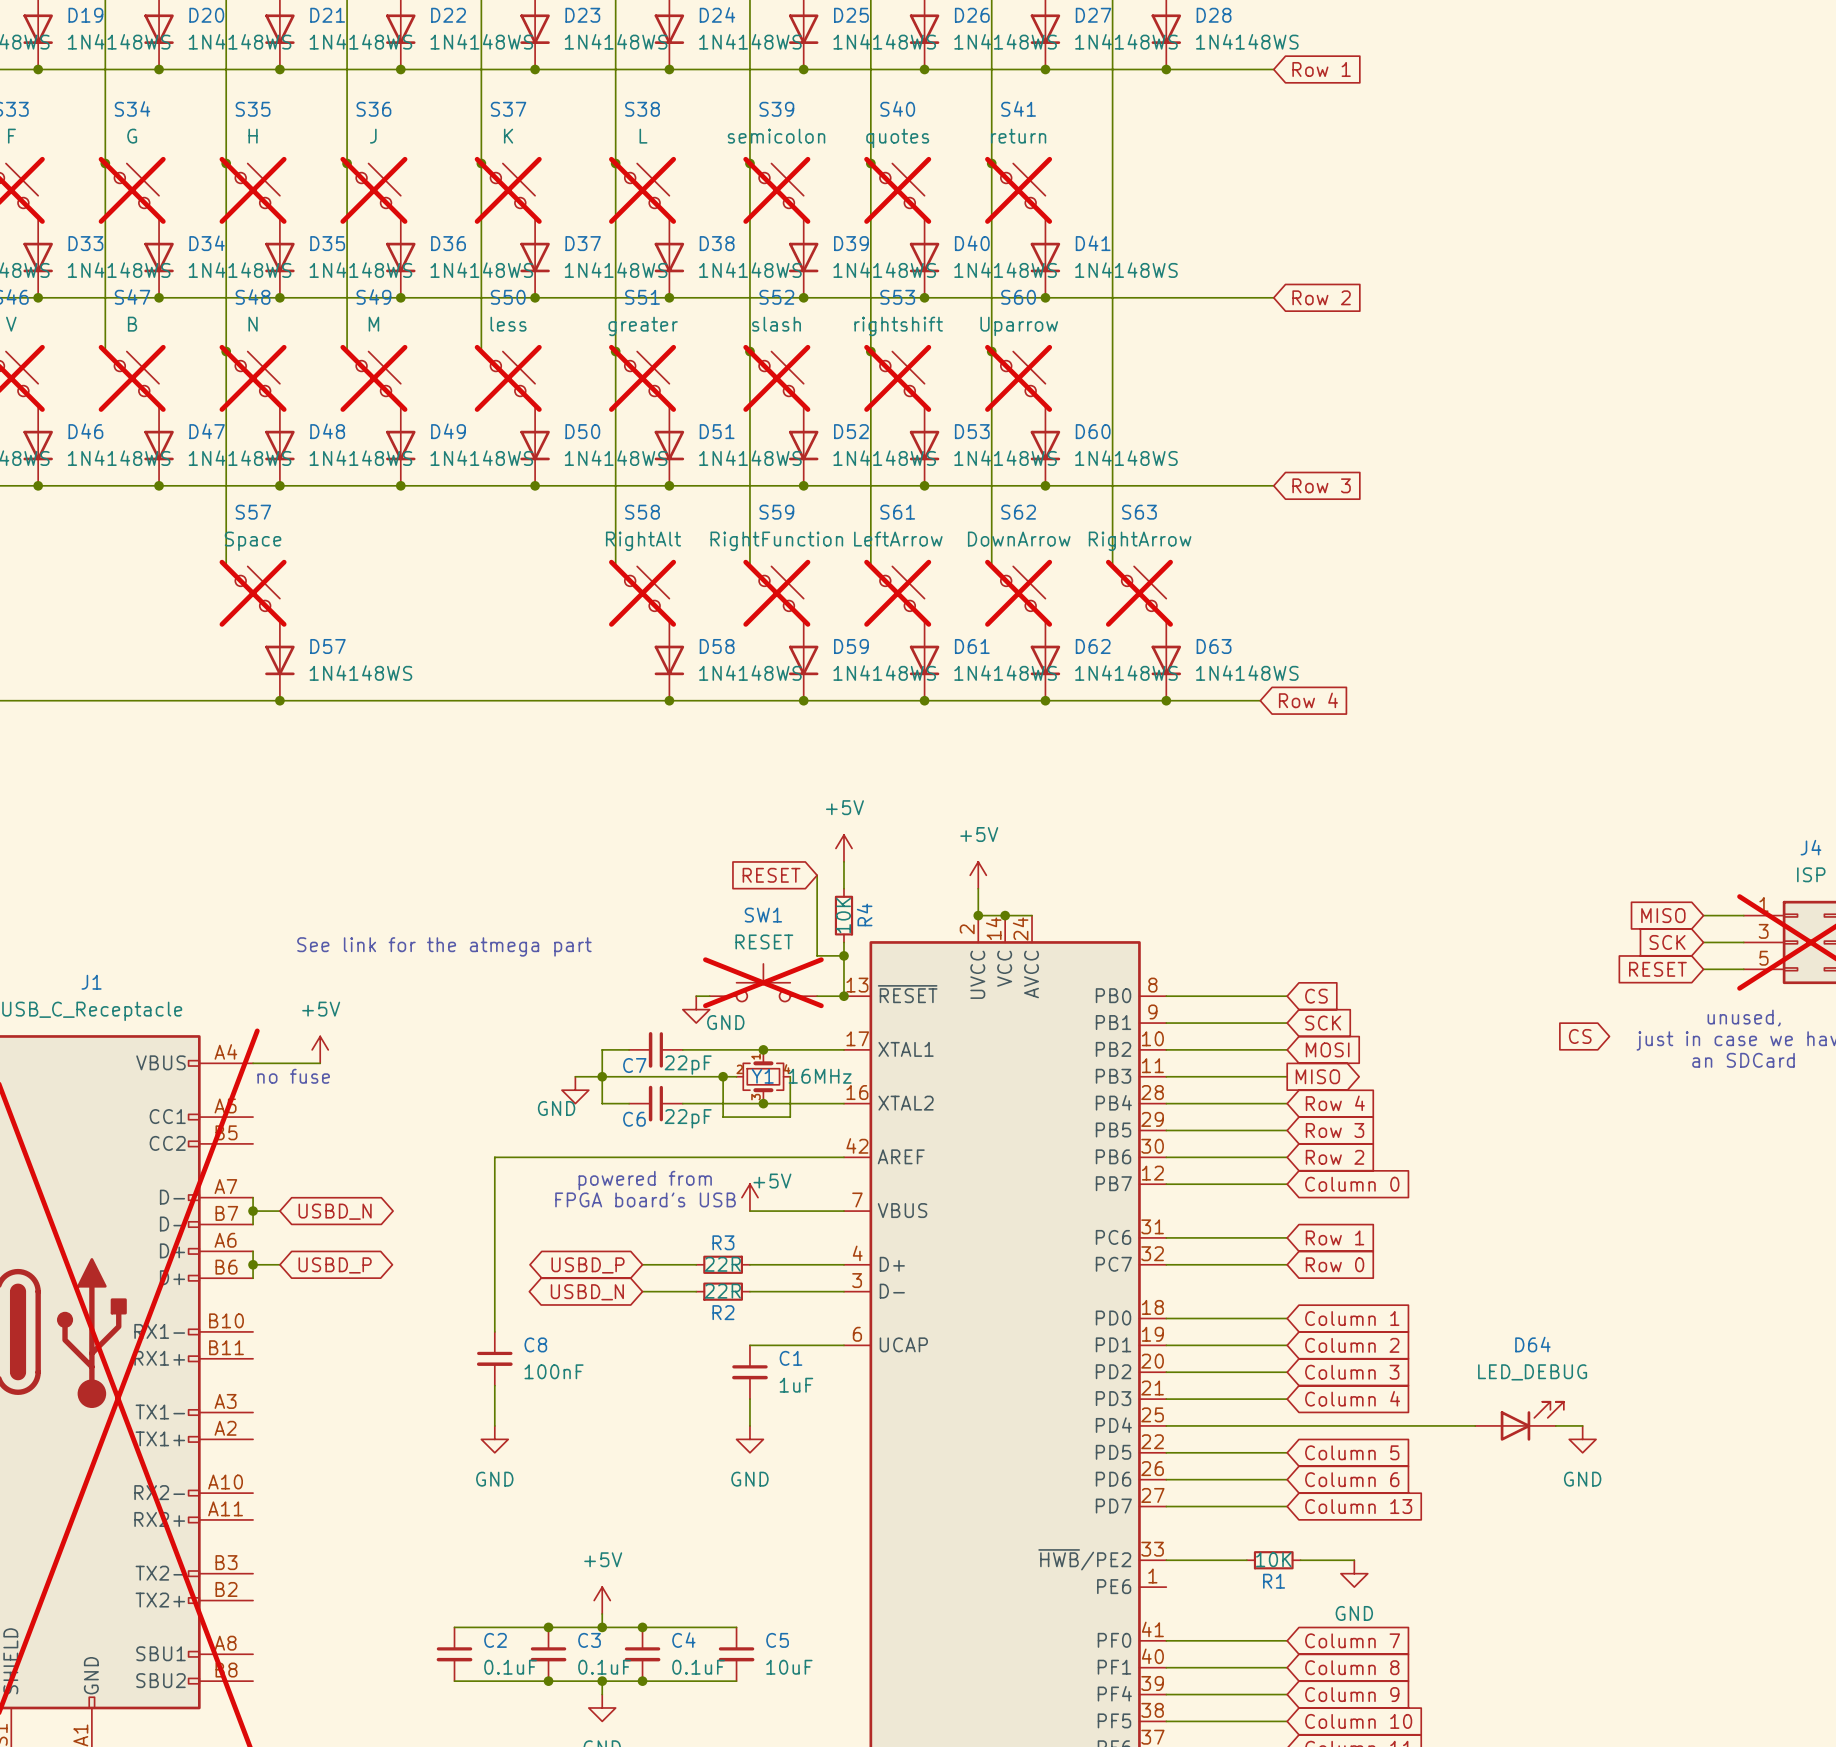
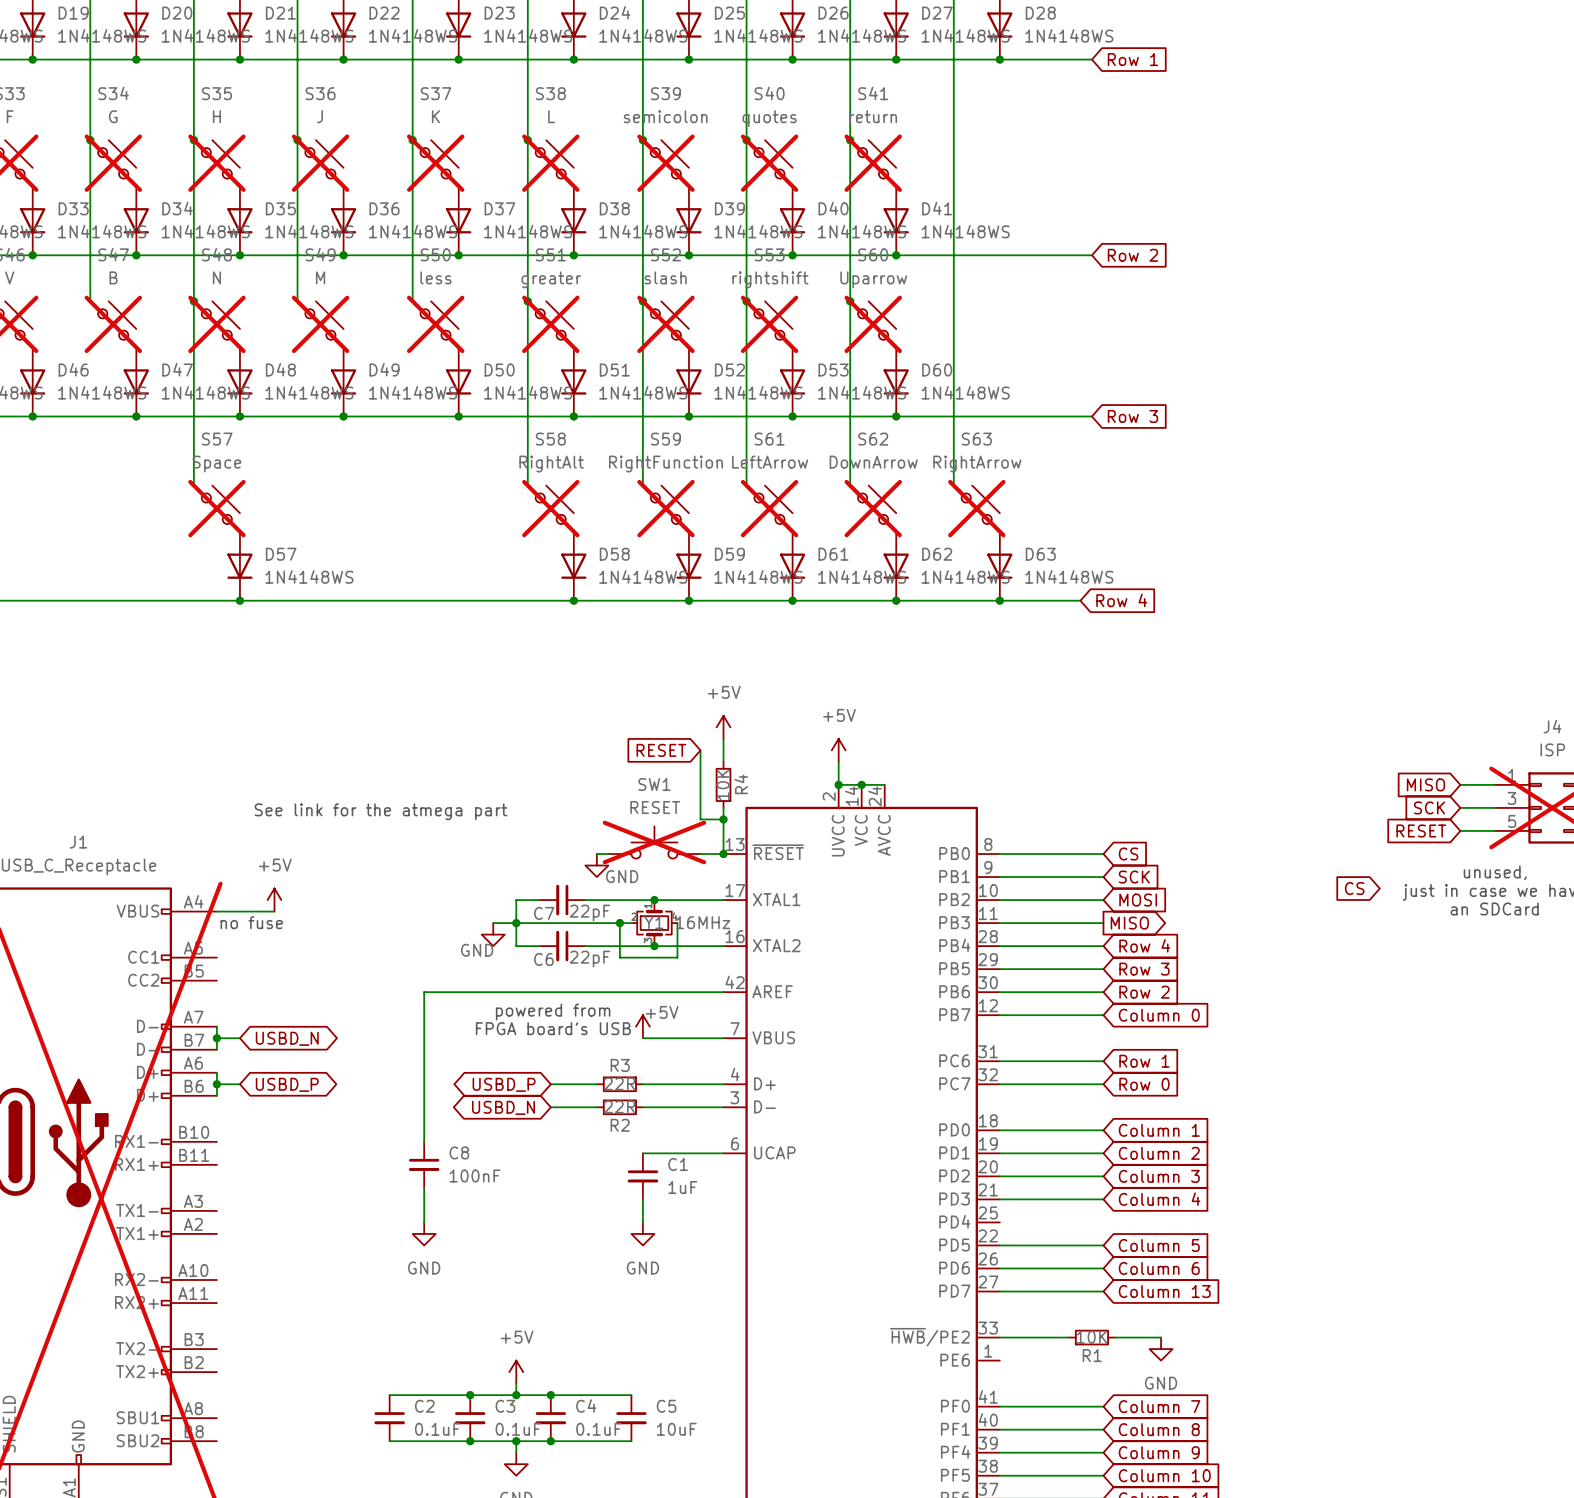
D64: LED_DEBUG (1519, 1421) -> none
wire: (1166, 1425) (1475, 1425) -> none
wire: (1555, 1425) (1582, 1425) -> none
power symbol: GND (1582, 1439) -> none

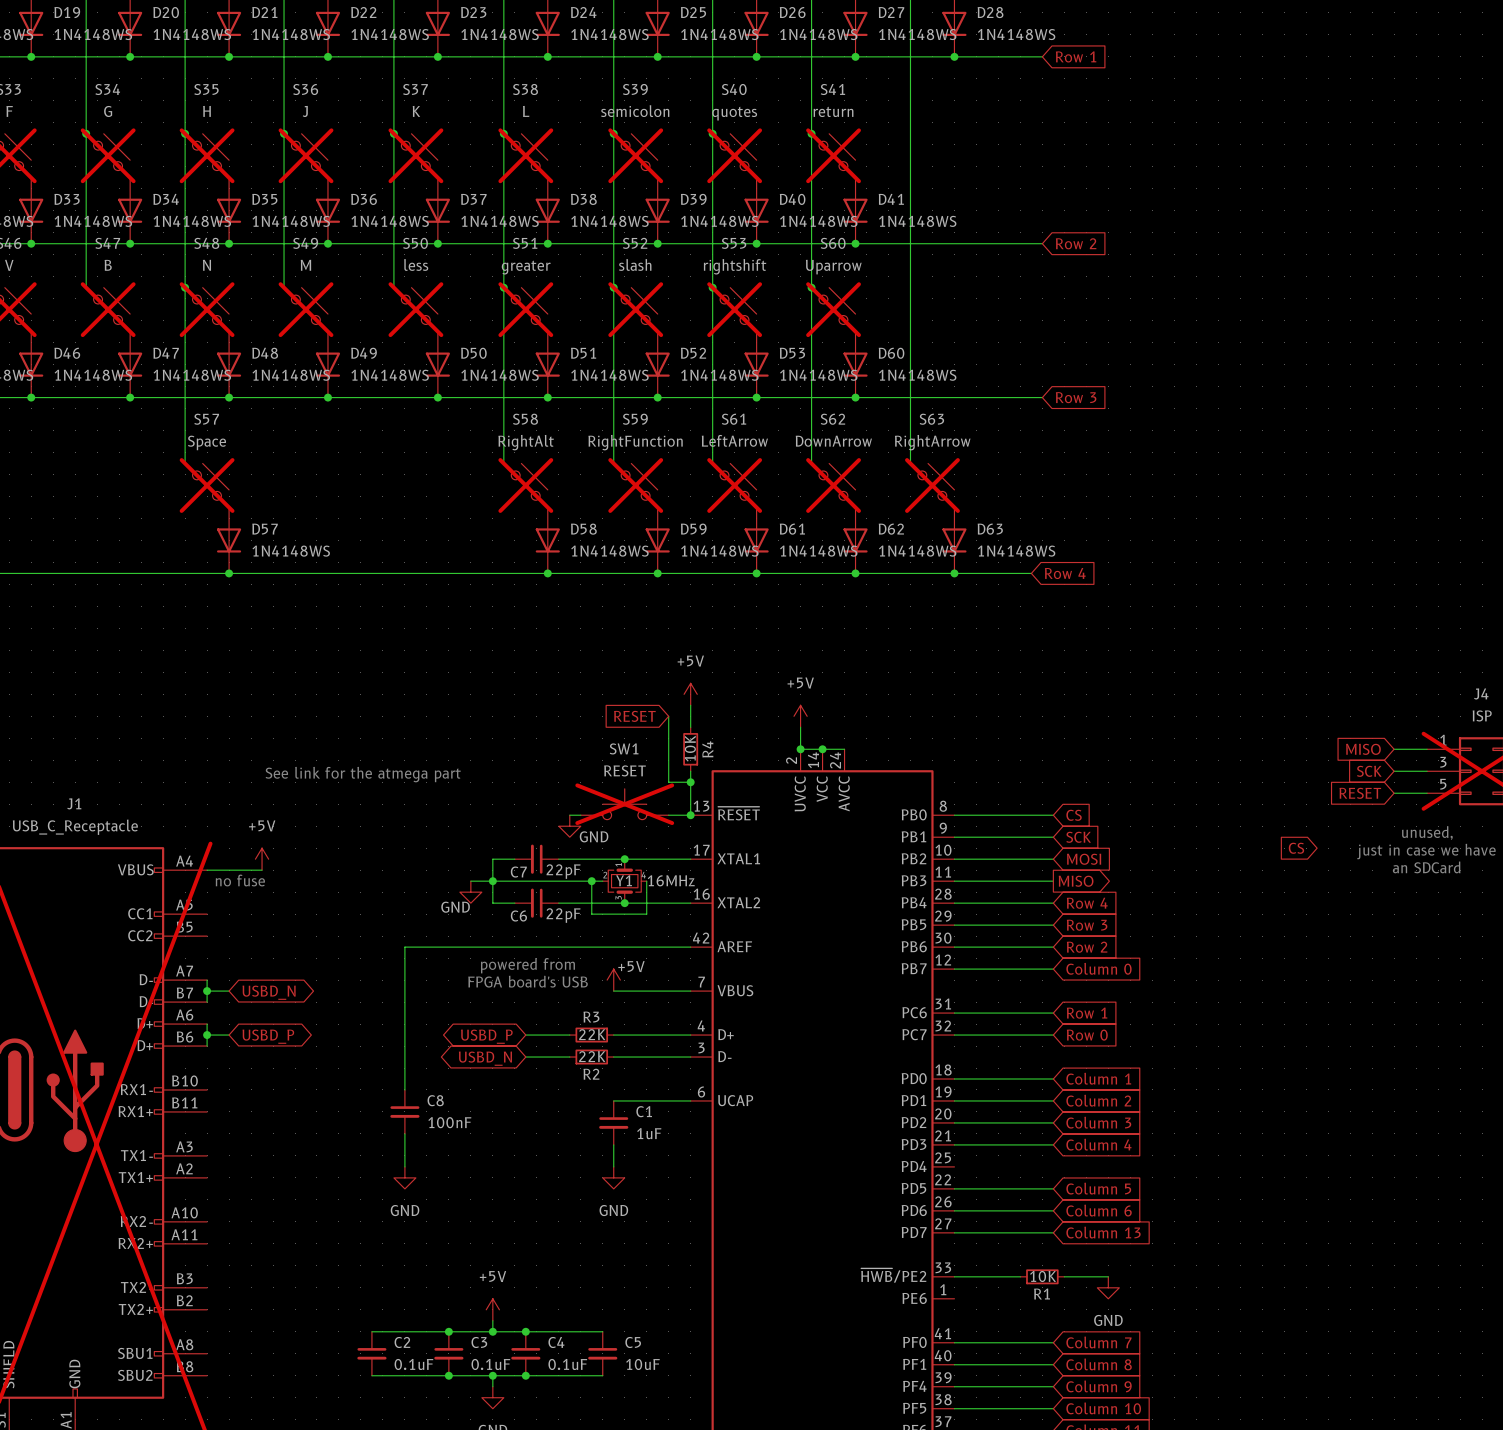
R3 value: 22R (619, 1083) -> 22K (592, 1034)
R2 value: 22R (619, 1106) -> 22K (592, 1056)

